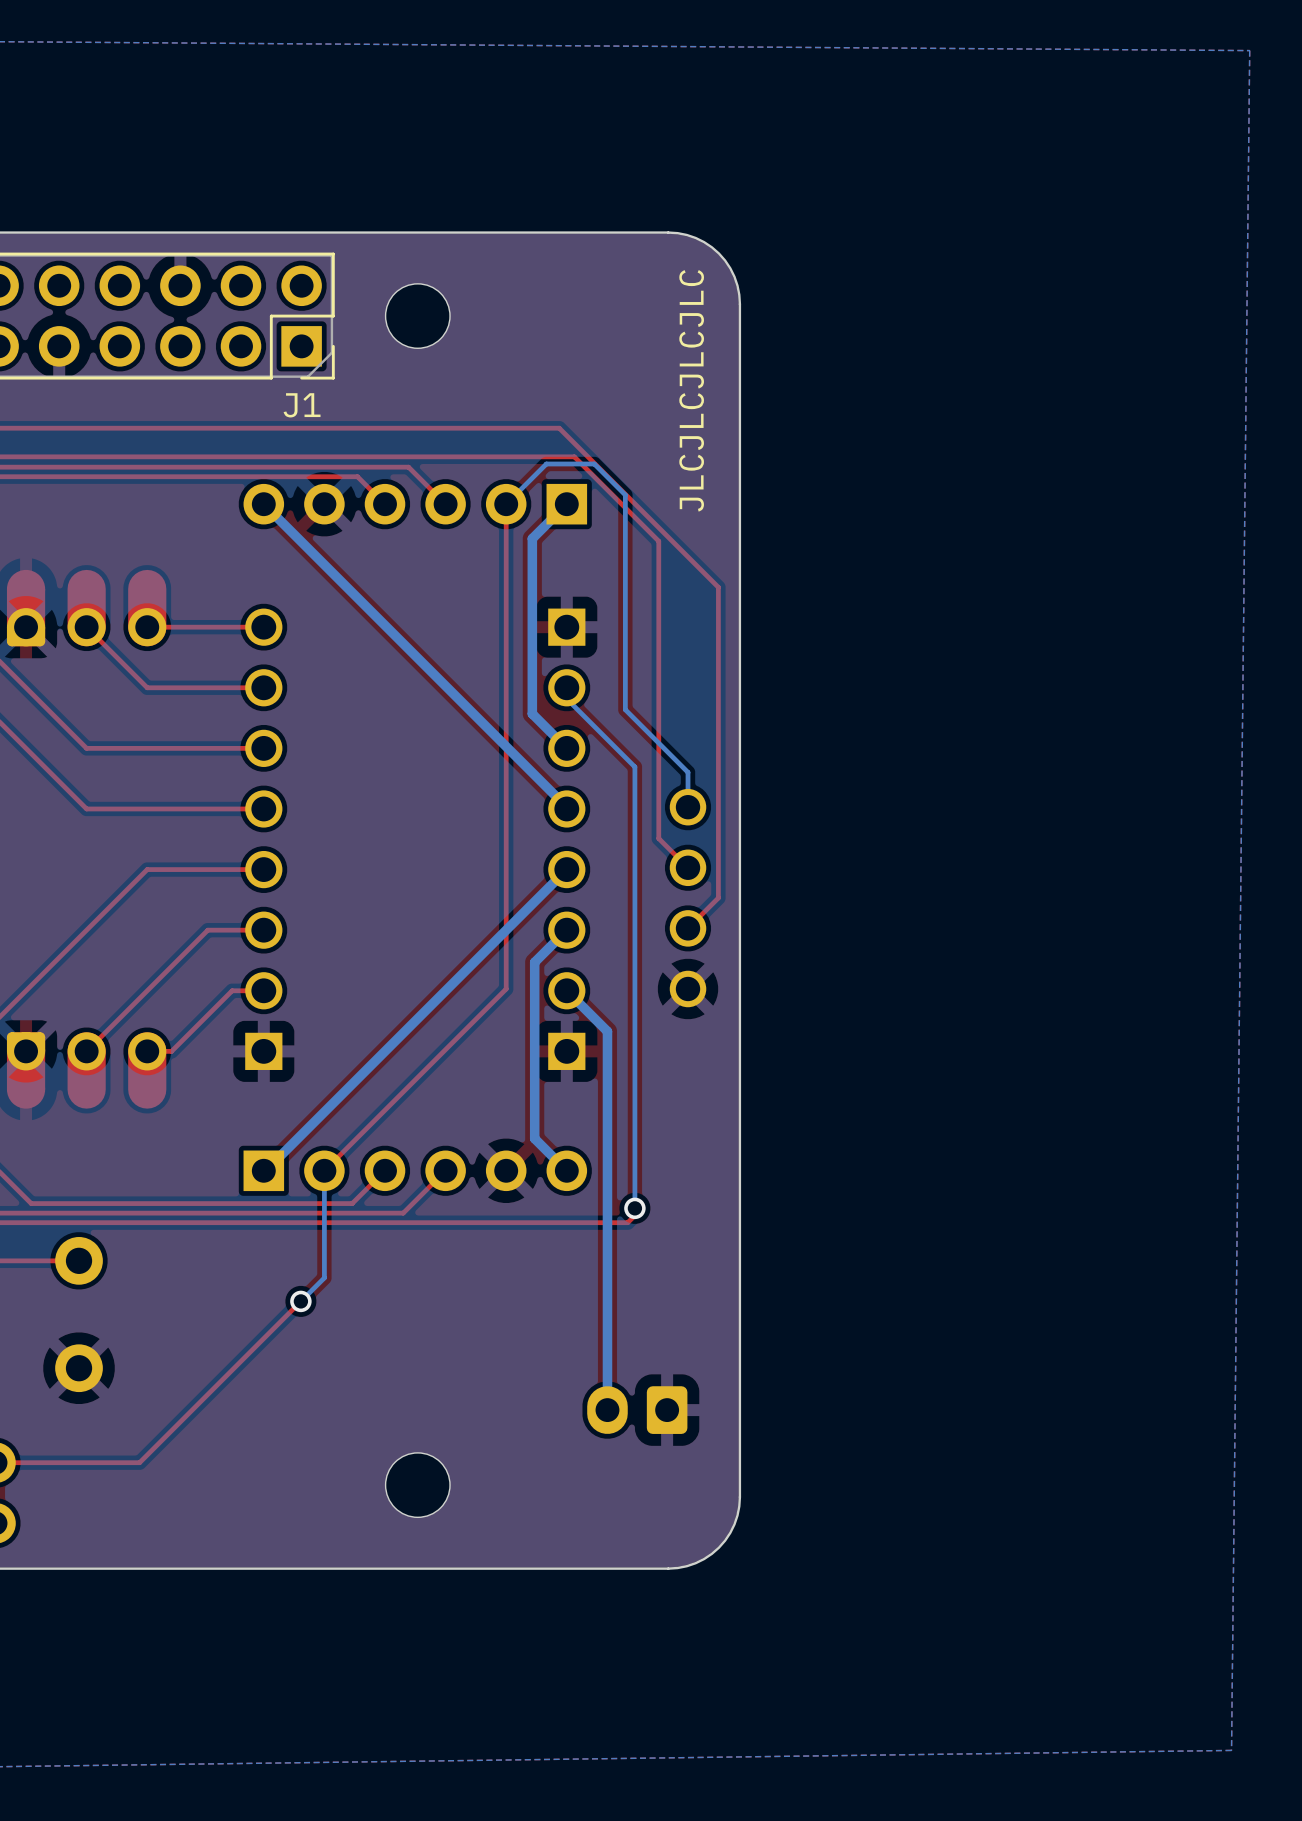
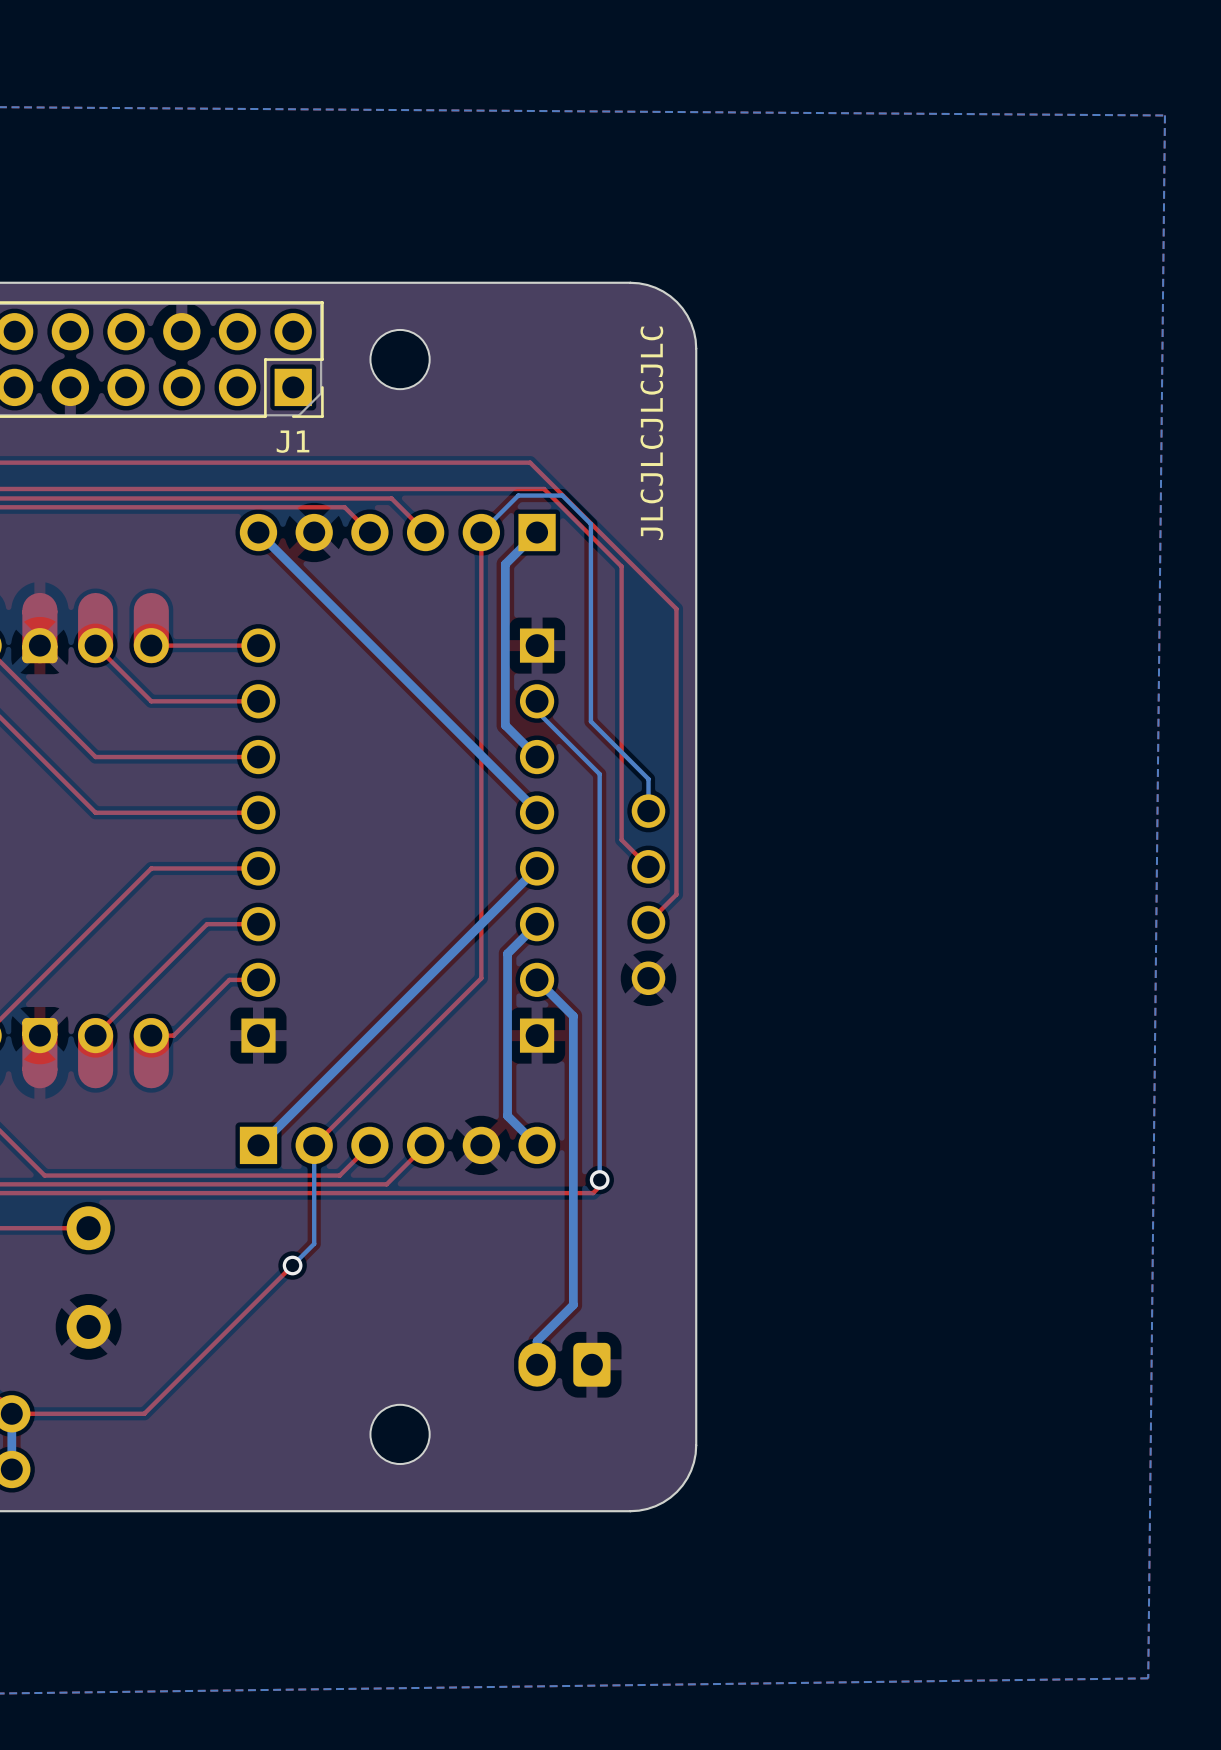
bottom track: (606, 1030) (607, 1410) -> (573, 1016) (573, 1304) (537, 1341) (537, 1364)
part position: (637, 1410) -> (564, 1364)

